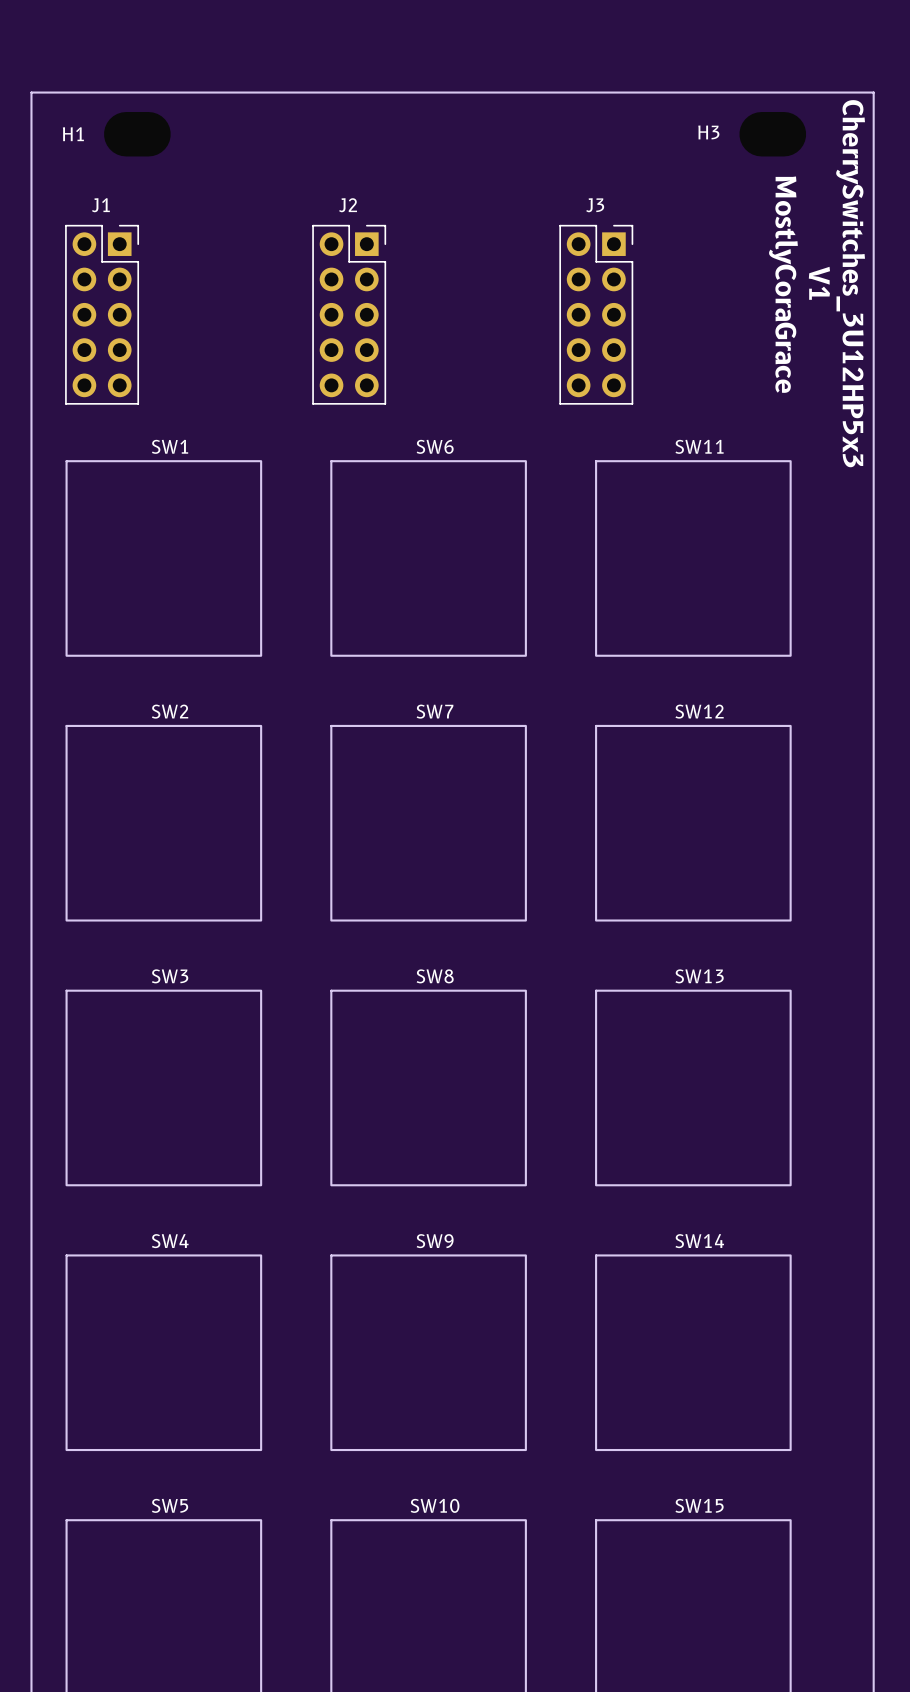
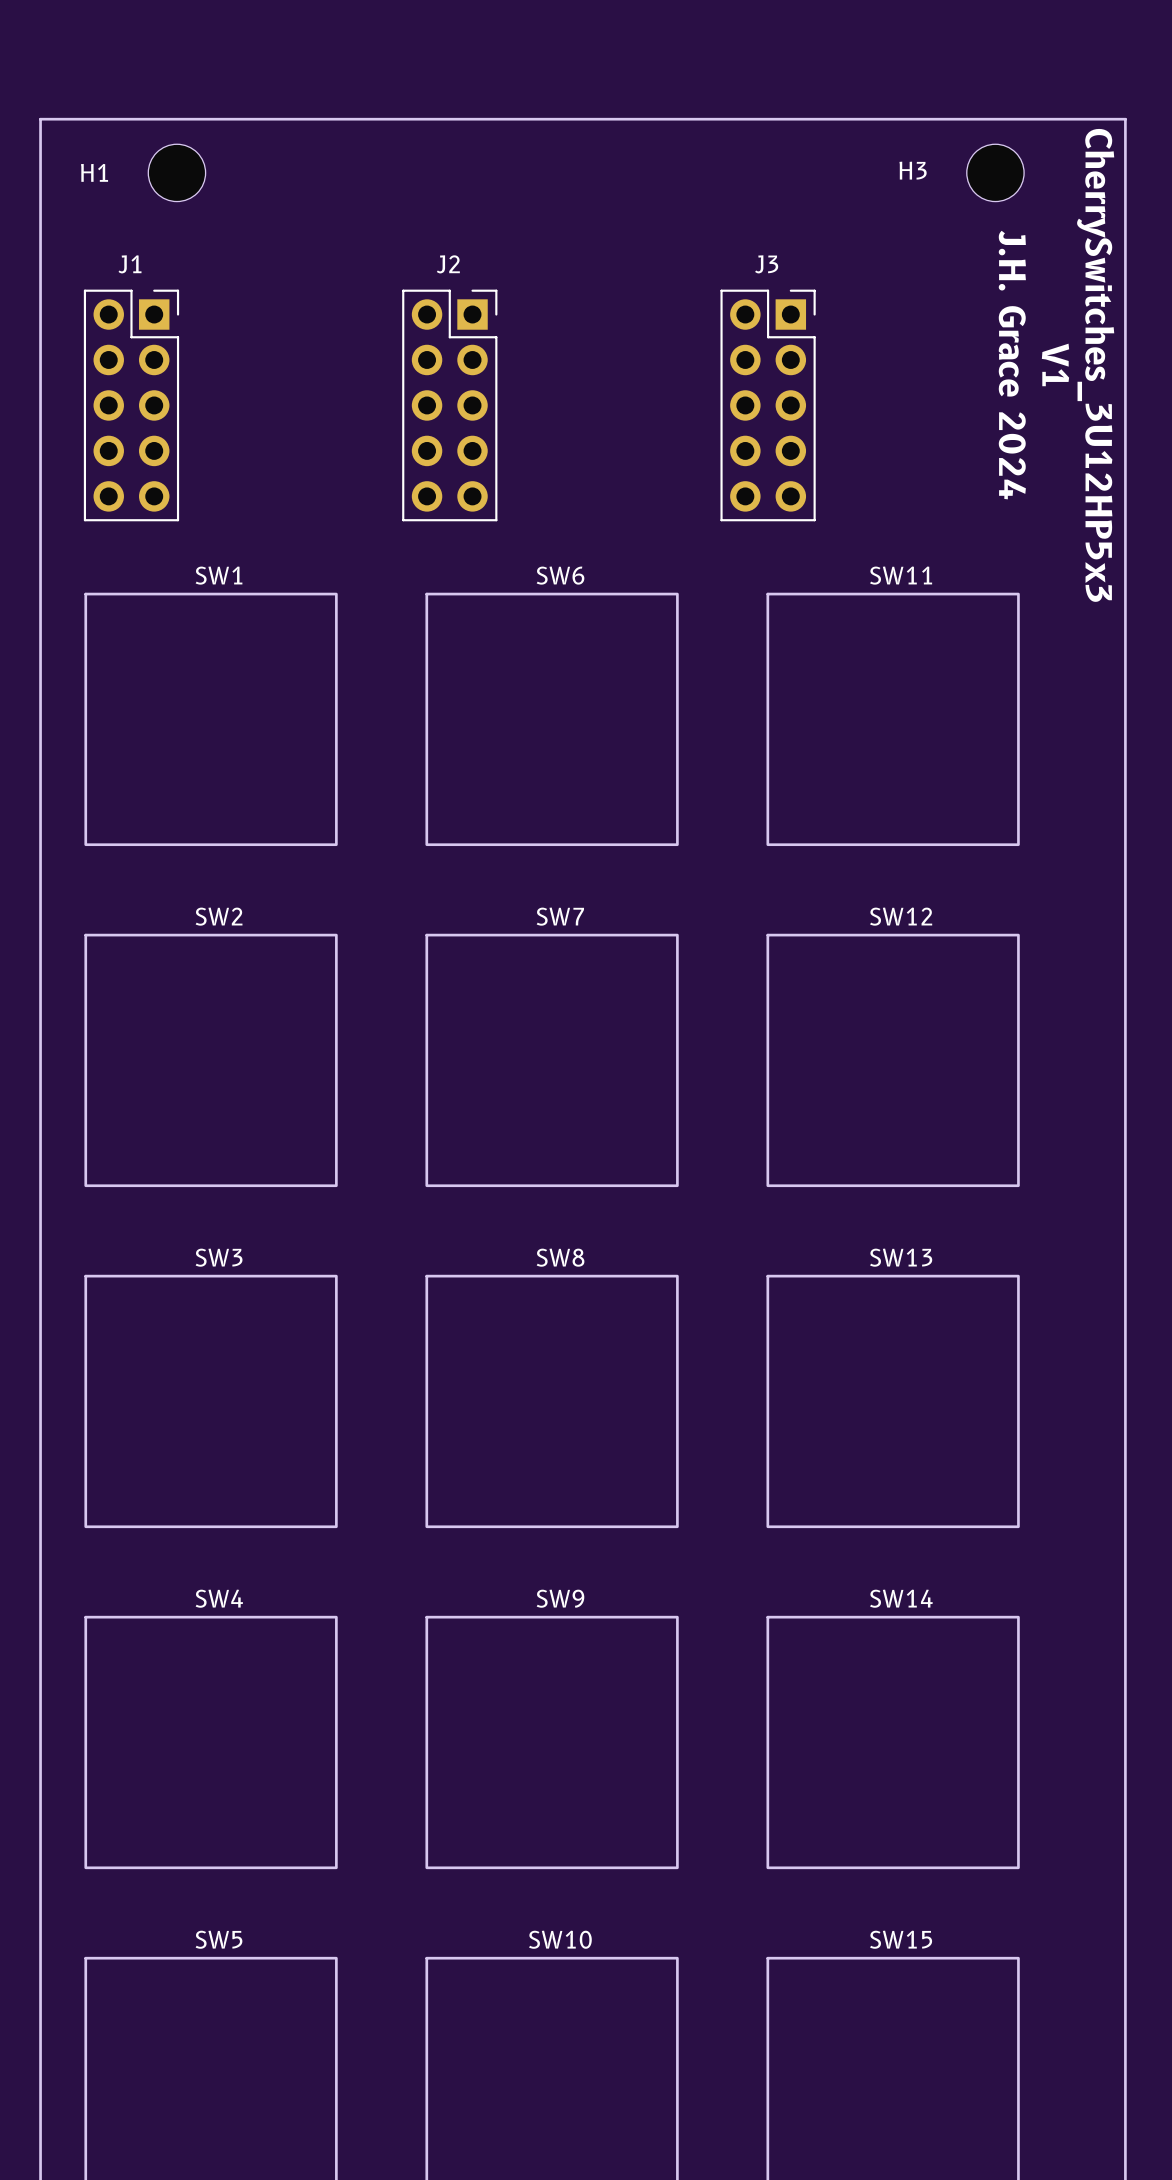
H1 footprint: [104, 112, 171, 157] -> [148, 144, 206, 202]
H3 footprint: [739, 112, 807, 157] -> [966, 144, 1025, 202]
text: MostlyCoraGrace (783, 284) -> J.H. Grace 2024 (1012, 365)

